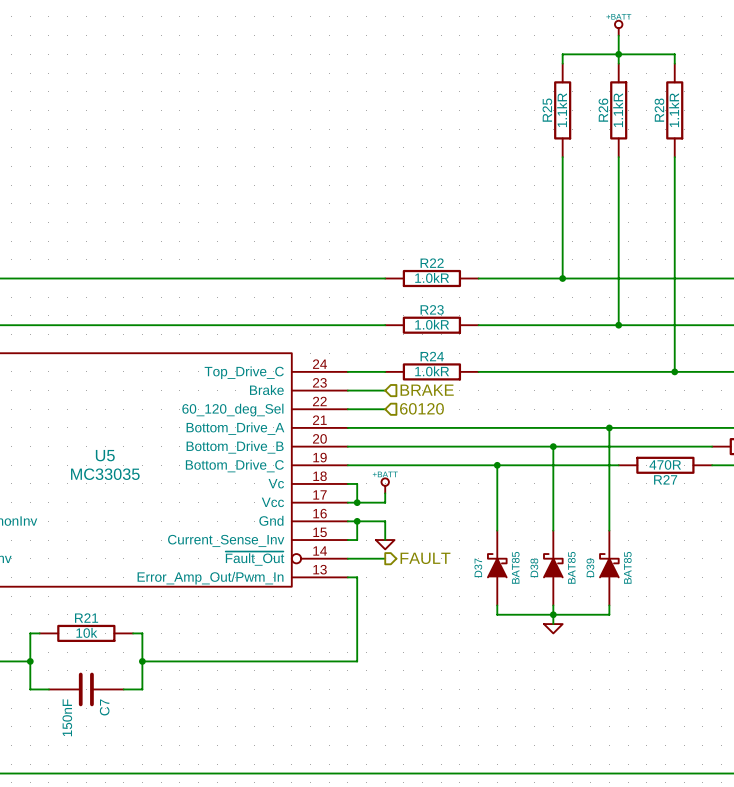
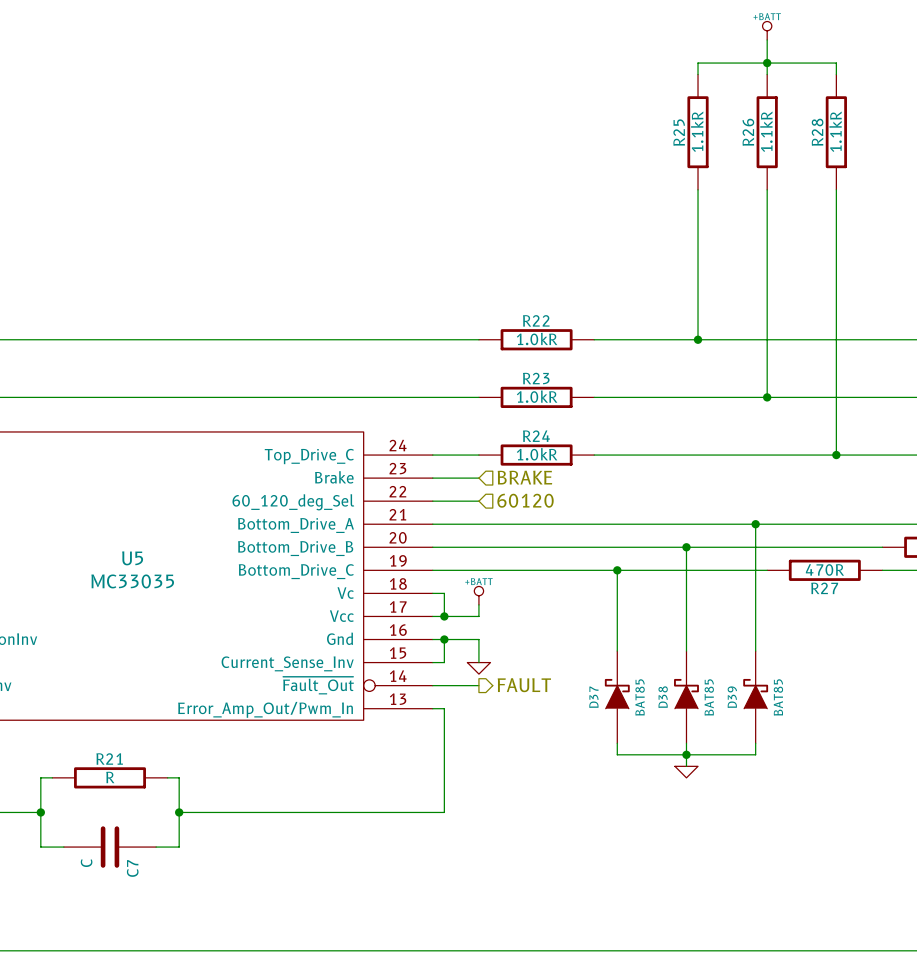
R21 value: 10k (86, 632) -> R (110, 777)
C7 value: 150nF (67, 717) -> C (86, 863)

